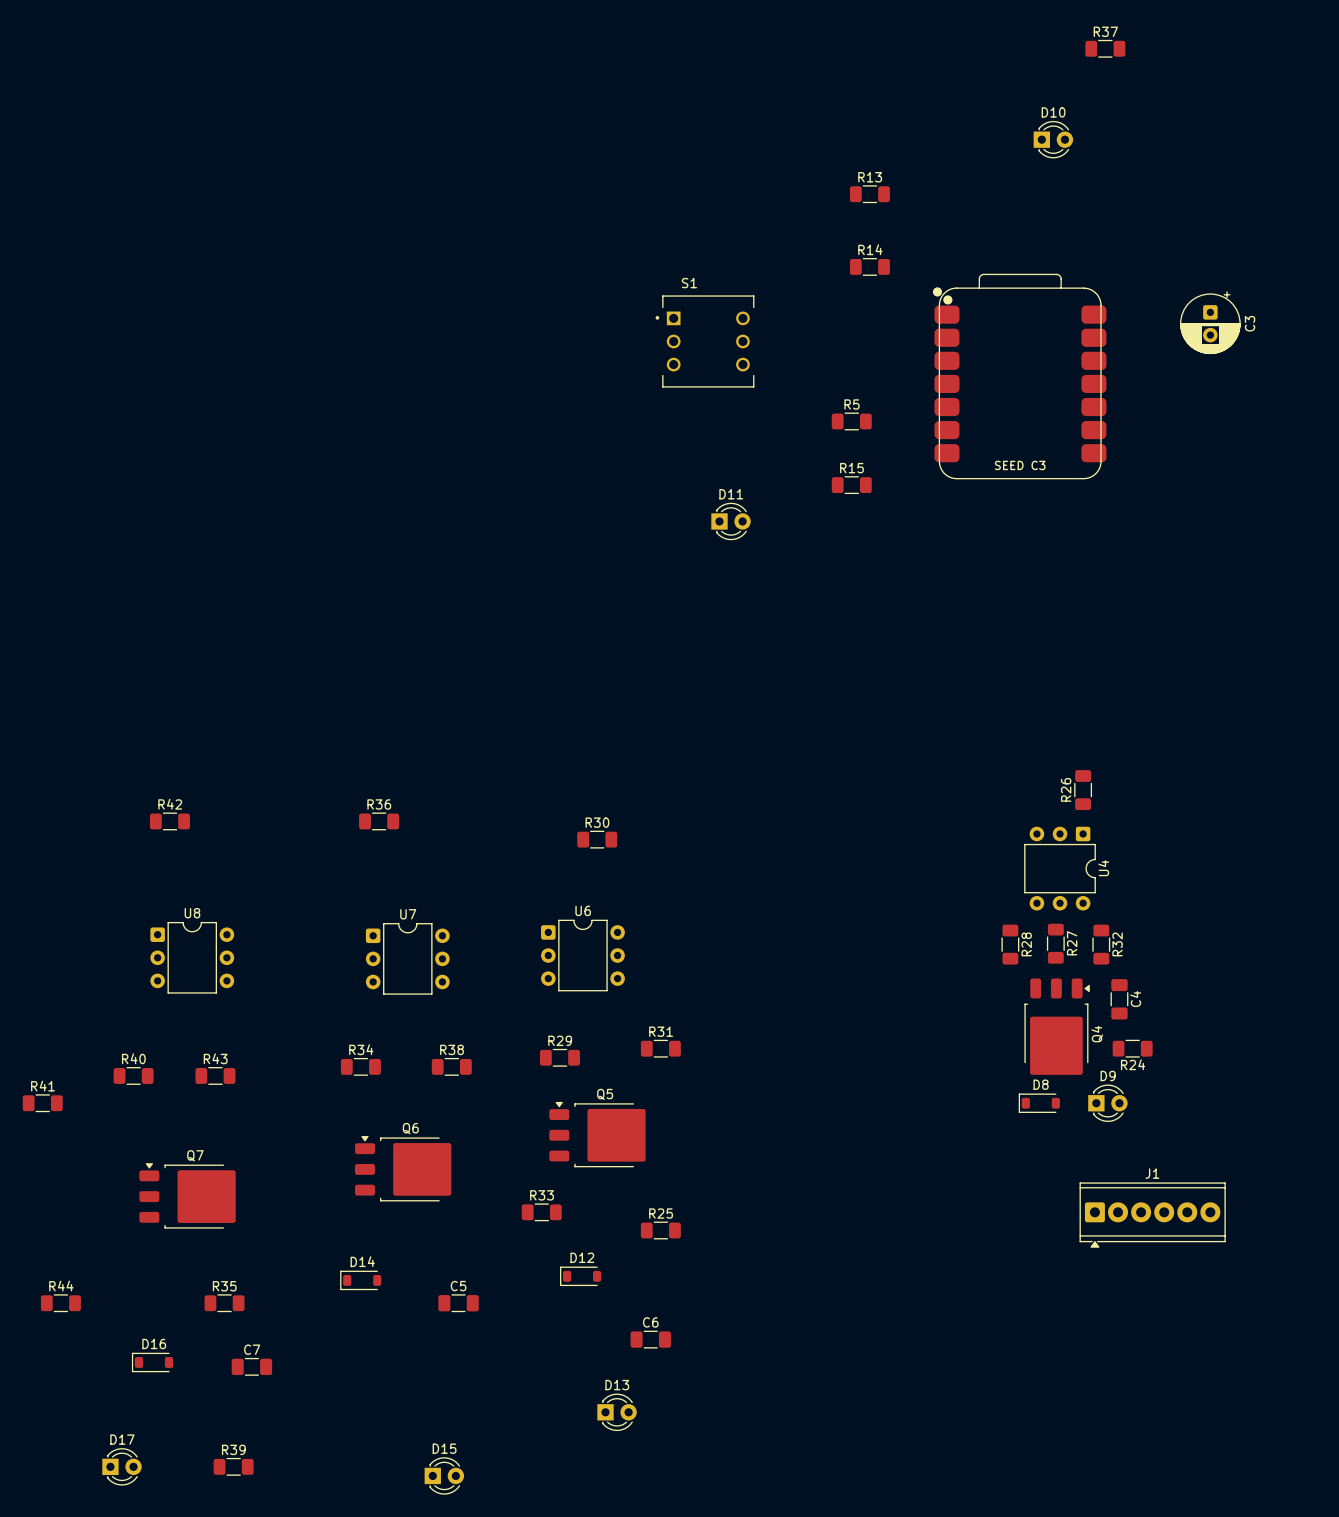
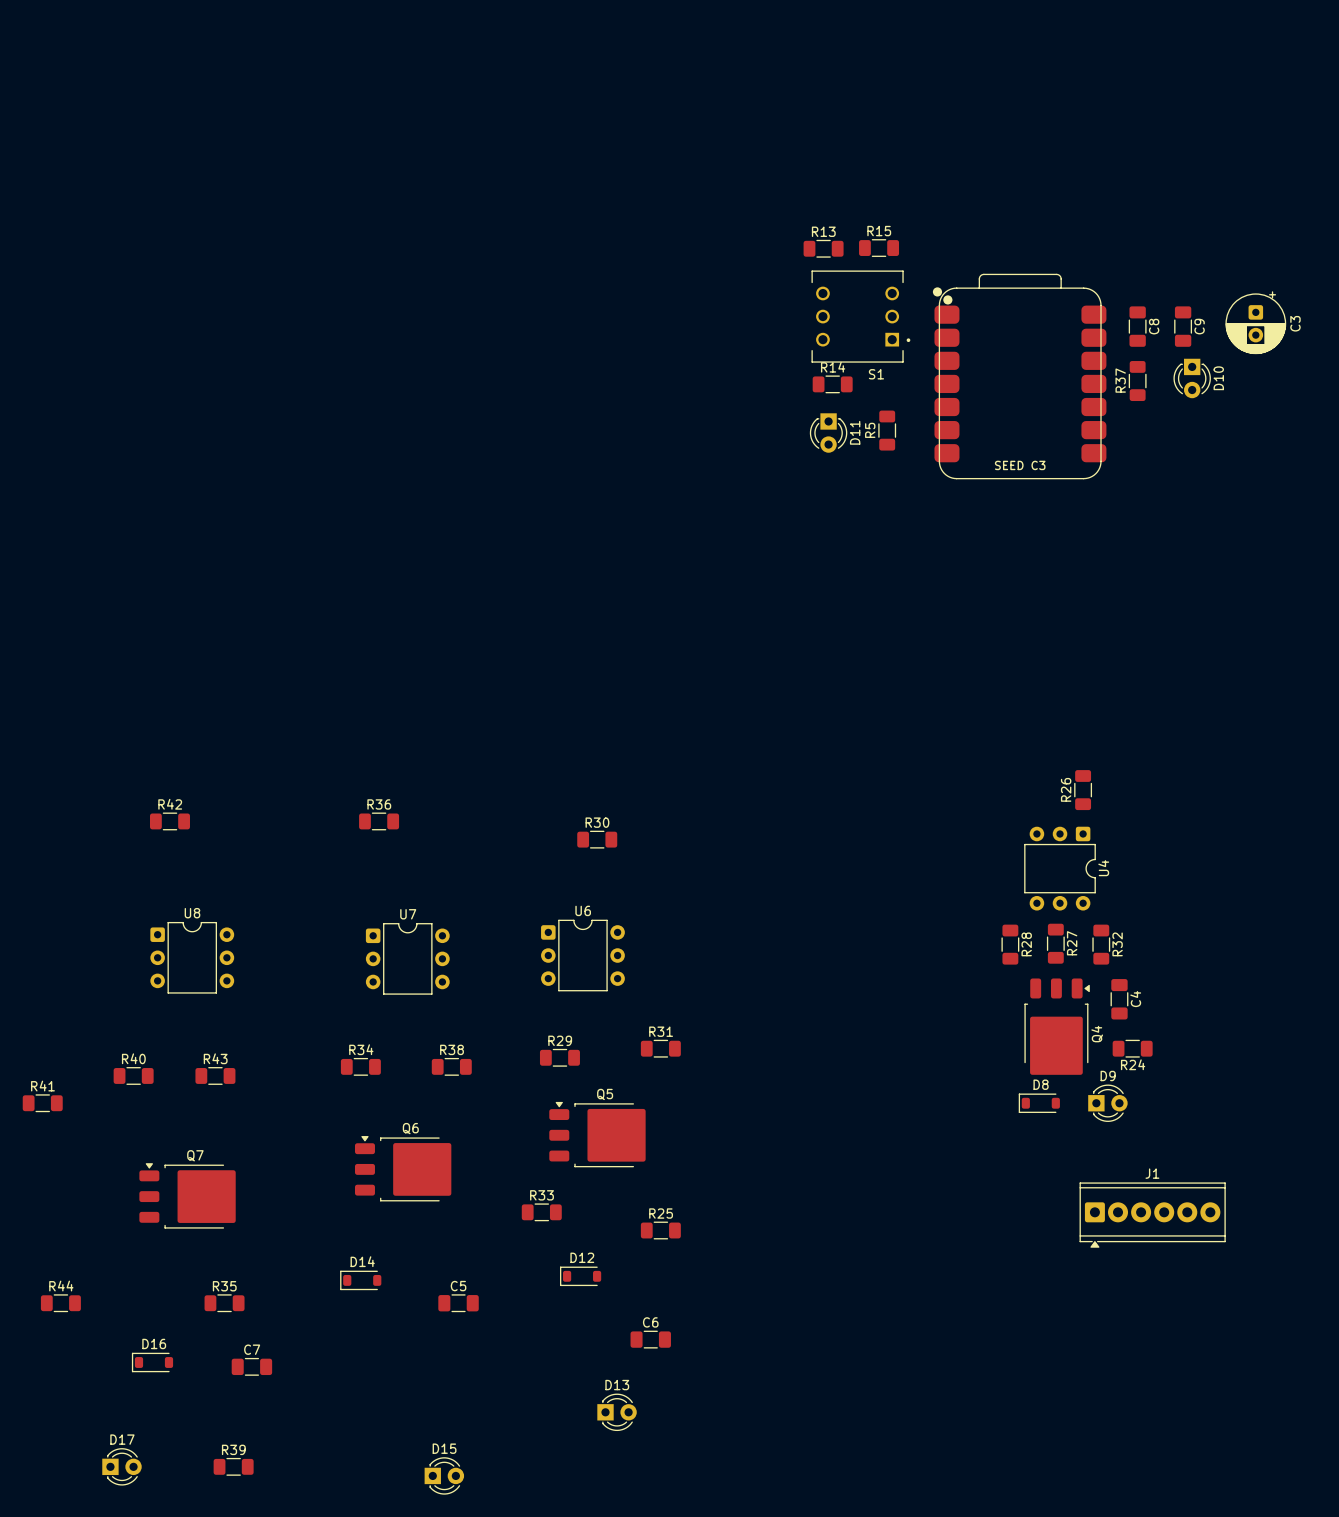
R37 name position: R37 (1105, 31) -> R37 (1120, 380)
R37 rotation: 0° (1105, 48) -> 90° clockwise (1137, 381)
R37 position: (1105, 48) -> (1137, 381)
D10 rotation: 0° (1053, 139) -> 90° clockwise (1192, 378)
D10 position: (1053, 139) -> (1192, 378)
R13 position: (869, 194) -> (823, 248)
R14 position: (869, 266) -> (832, 384)
C3 position: (1210, 322) -> (1255, 322)
C8: none -> (1137, 326)
C9: none -> (1183, 326)
S1 rotation: 0° (704, 341) -> 180° (860, 316)
S1 position: (704, 341) -> (860, 316)
R5 name position: R5 (851, 404) -> R5 (870, 430)
R5 rotation: 0° (851, 421) -> 90° clockwise (887, 430)
R5 position: (851, 421) -> (887, 430)
R15 position: (851, 485) -> (879, 248)
D11 rotation: 0° (731, 521) -> 90° clockwise (828, 433)
D11 position: (731, 521) -> (828, 433)

